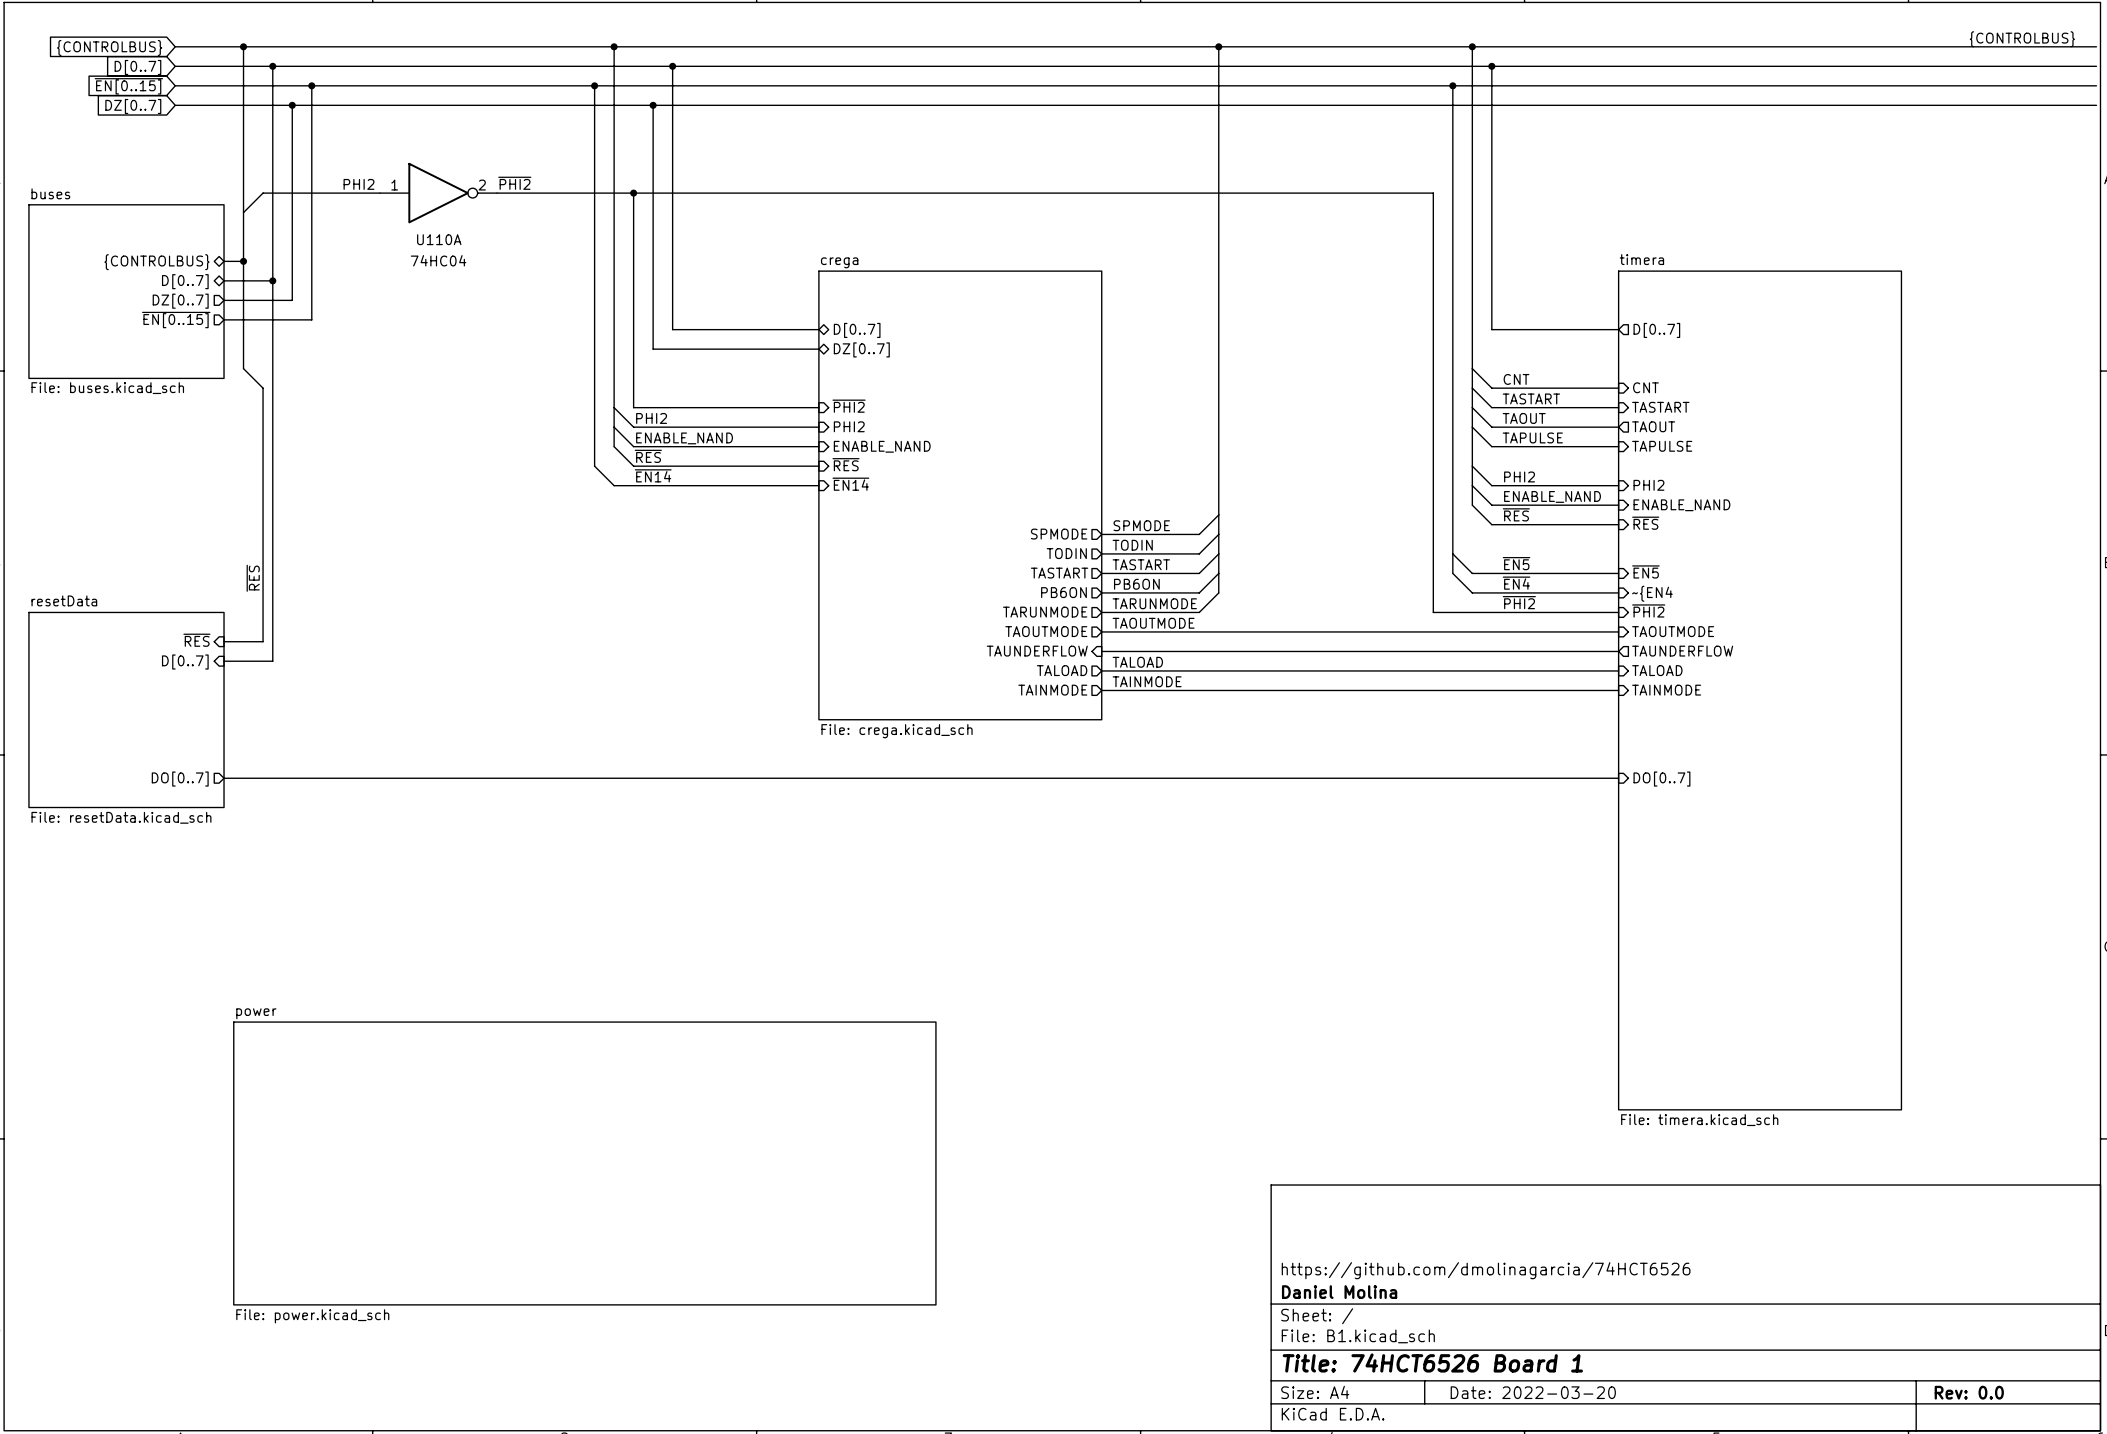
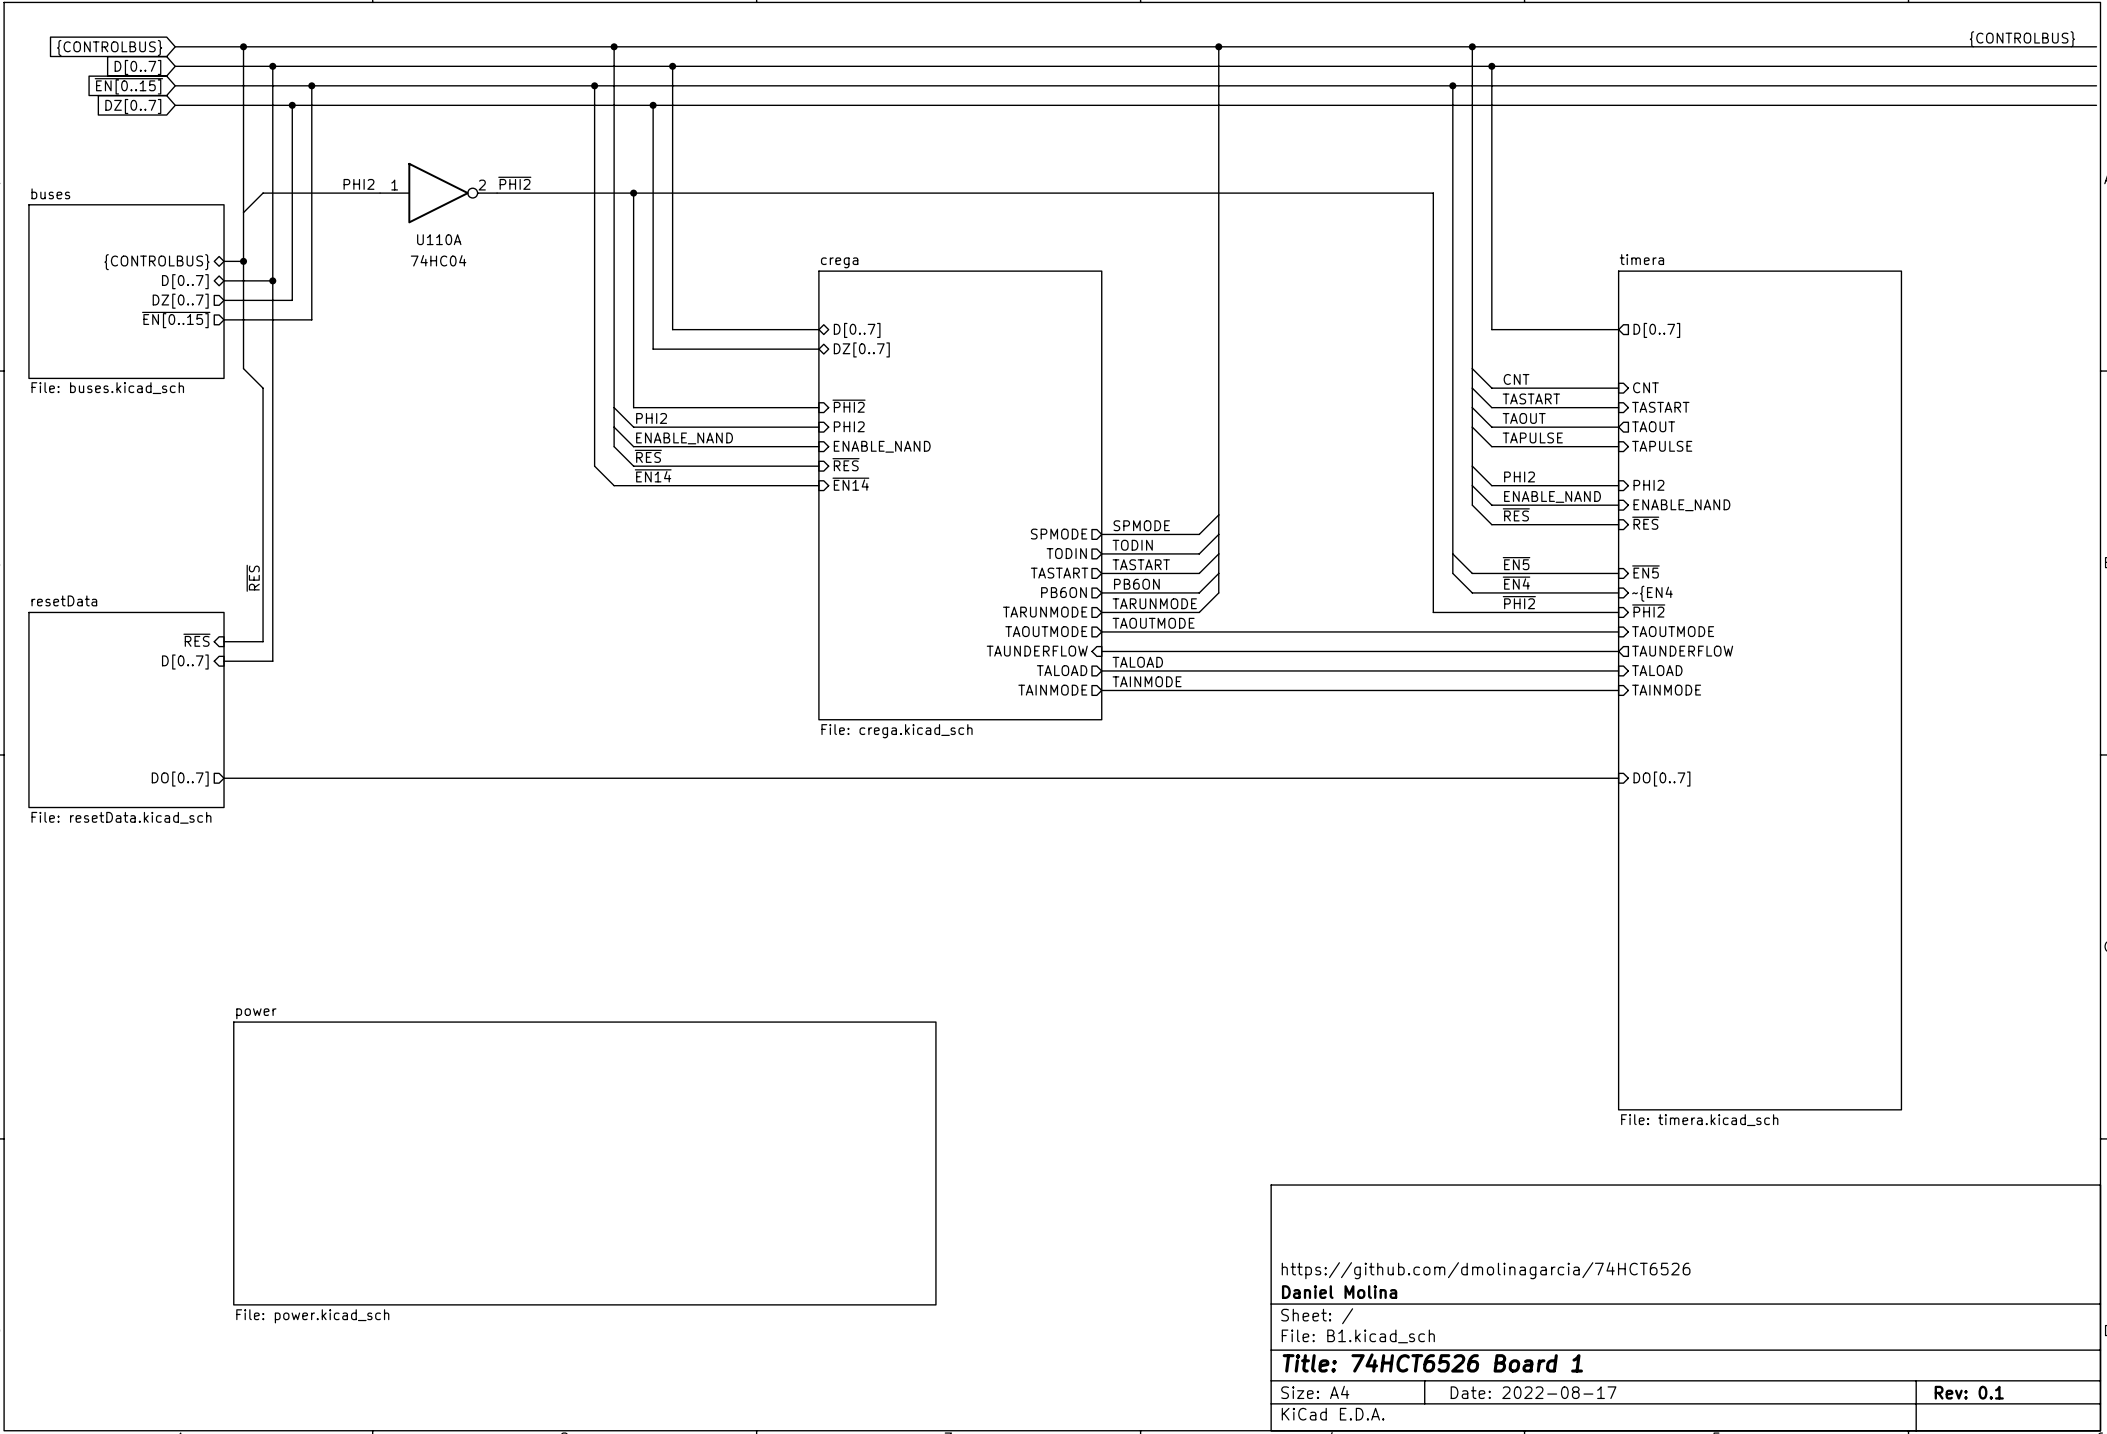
title block: Date: 2022-03-20 (1533, 1392) -> Date: 2022-08-17 (1533, 1392)
title block: Rev: 0.0 (1969, 1392) -> Rev: 0.1 (1969, 1392)

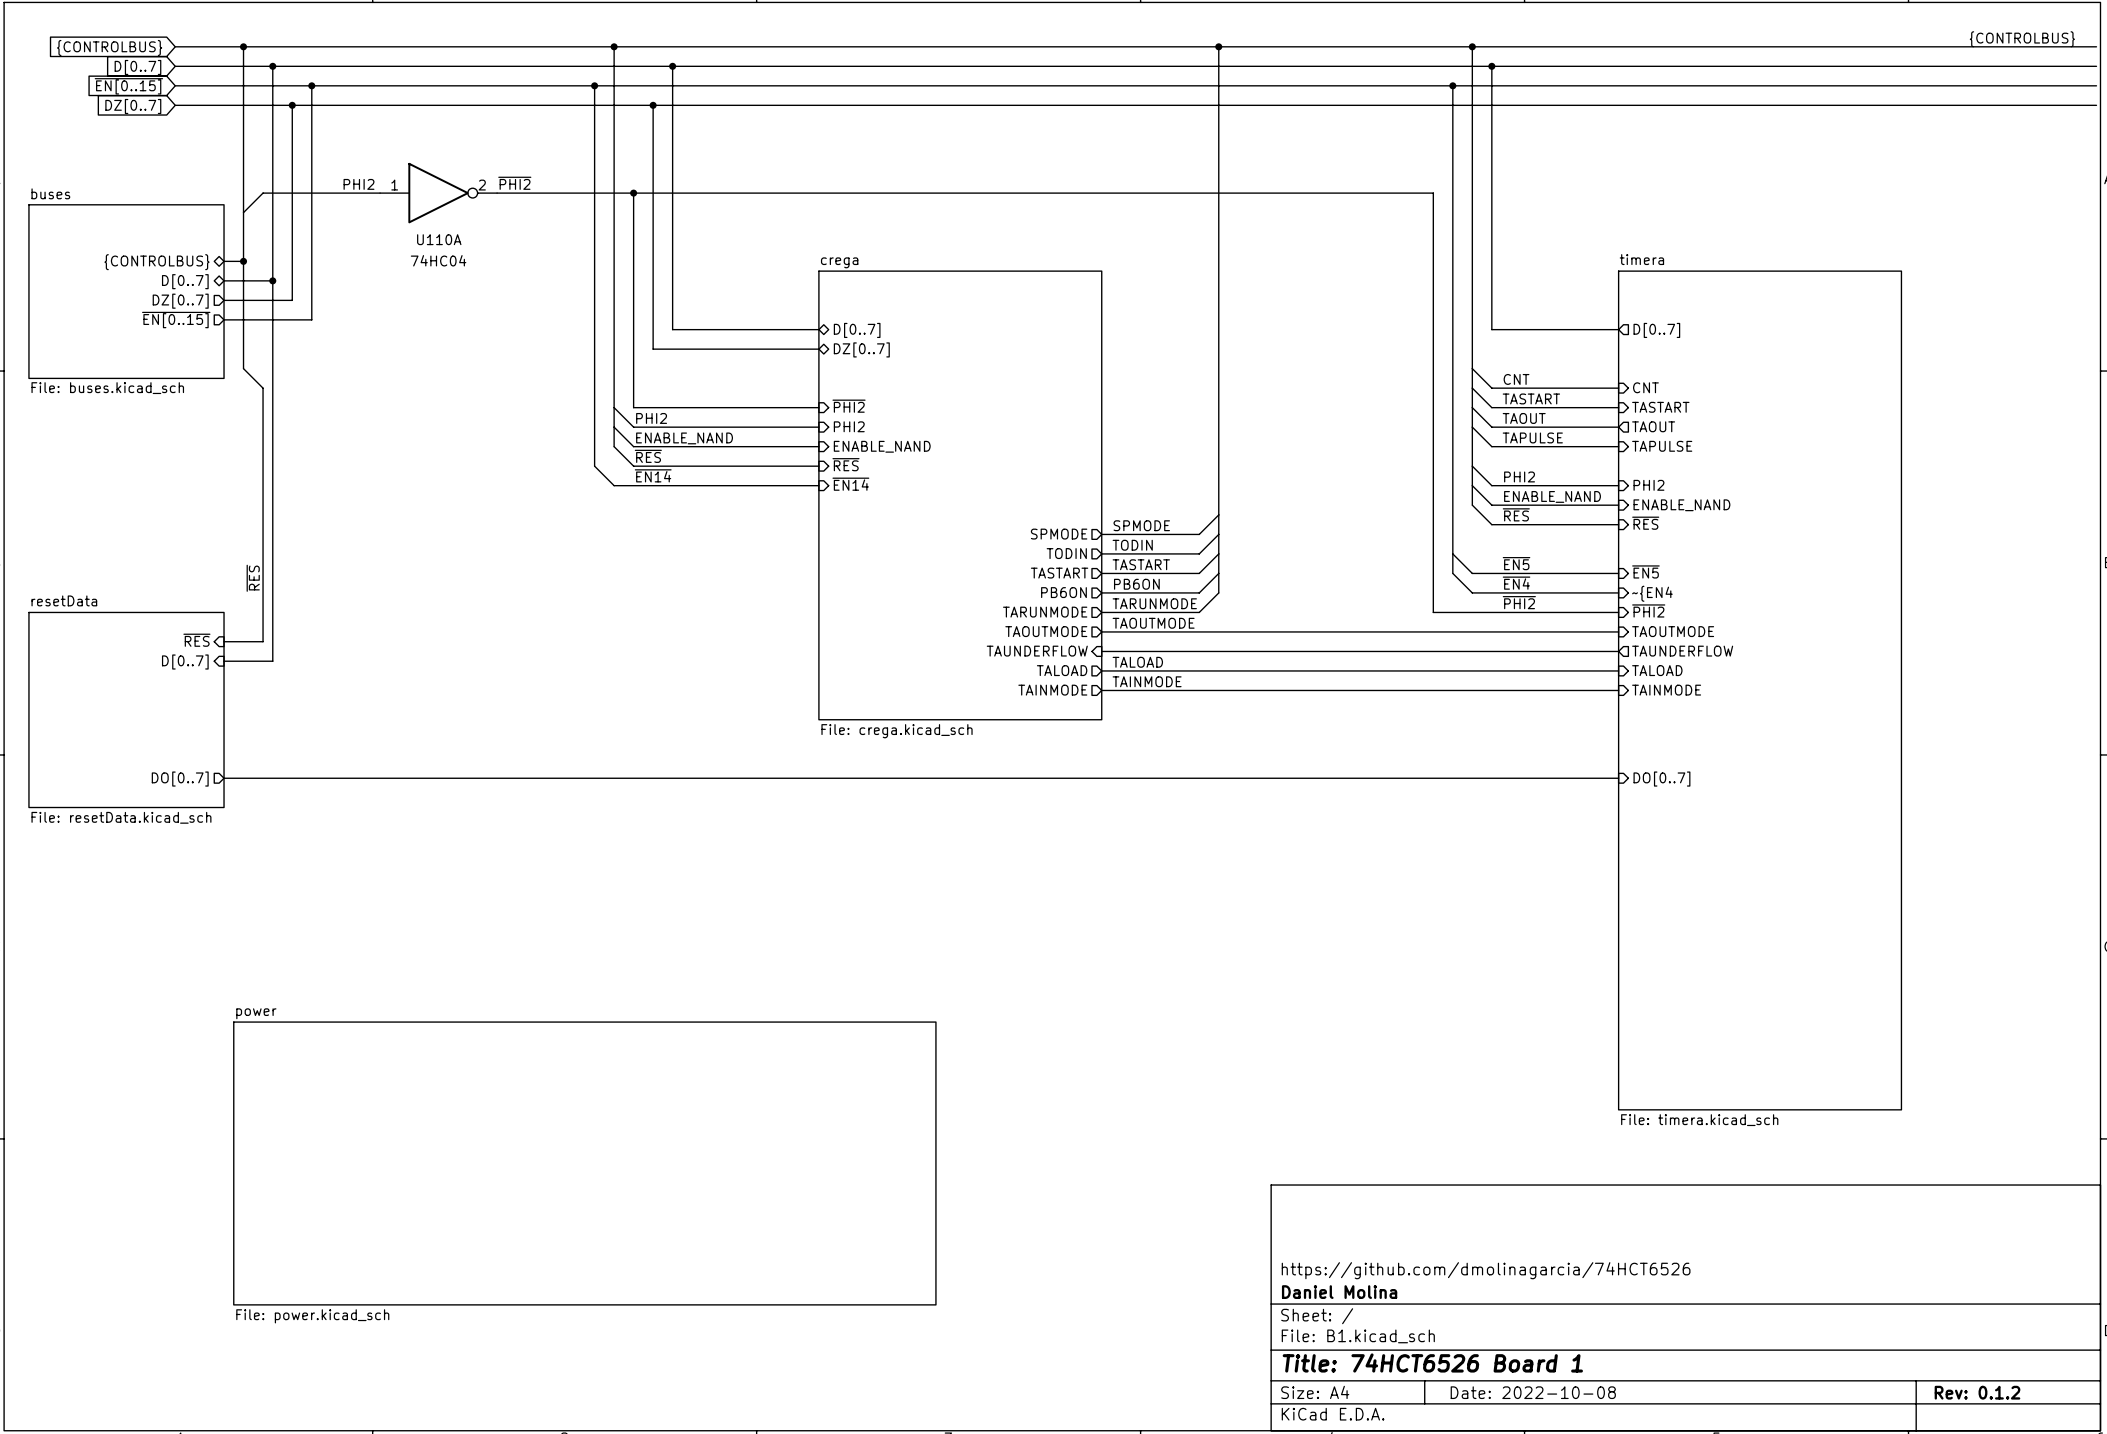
title block: Date: 2022-08-17 (1533, 1392) -> Date: 2022-10-08 (1533, 1392)
title block: Rev: 0.1 (1969, 1392) -> Rev: 0.1.2 (1977, 1392)

